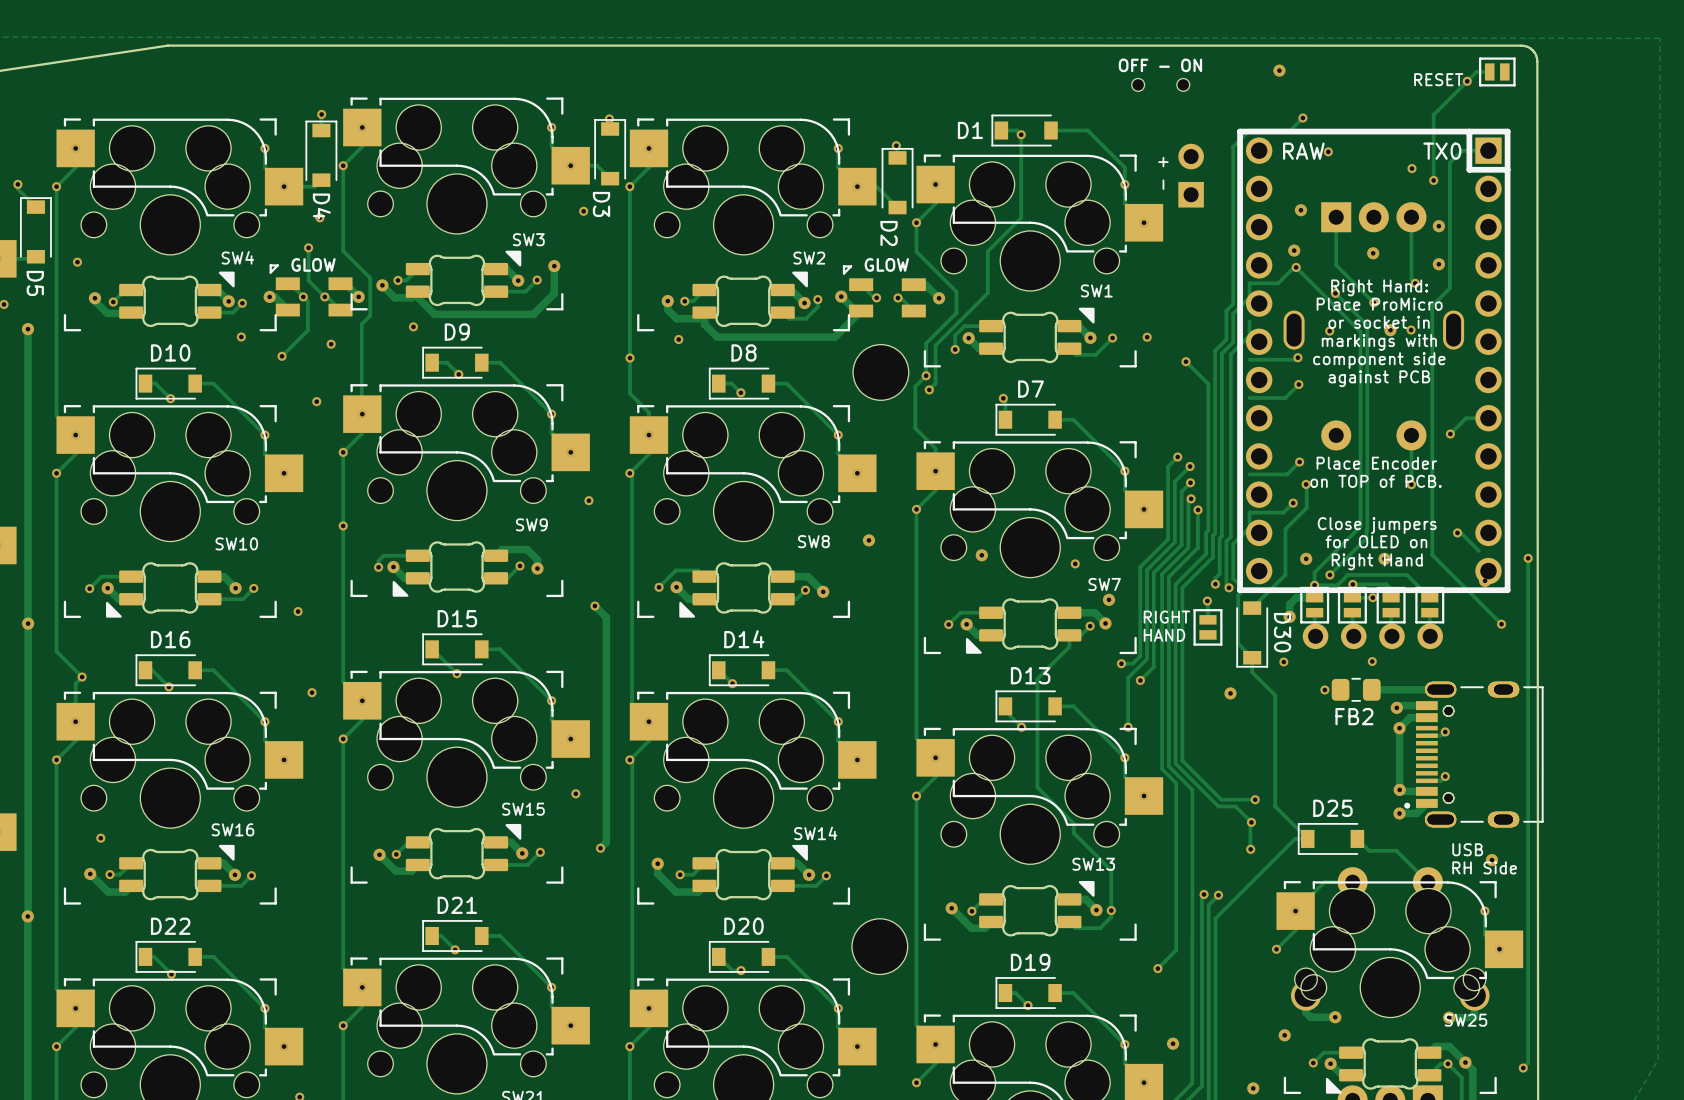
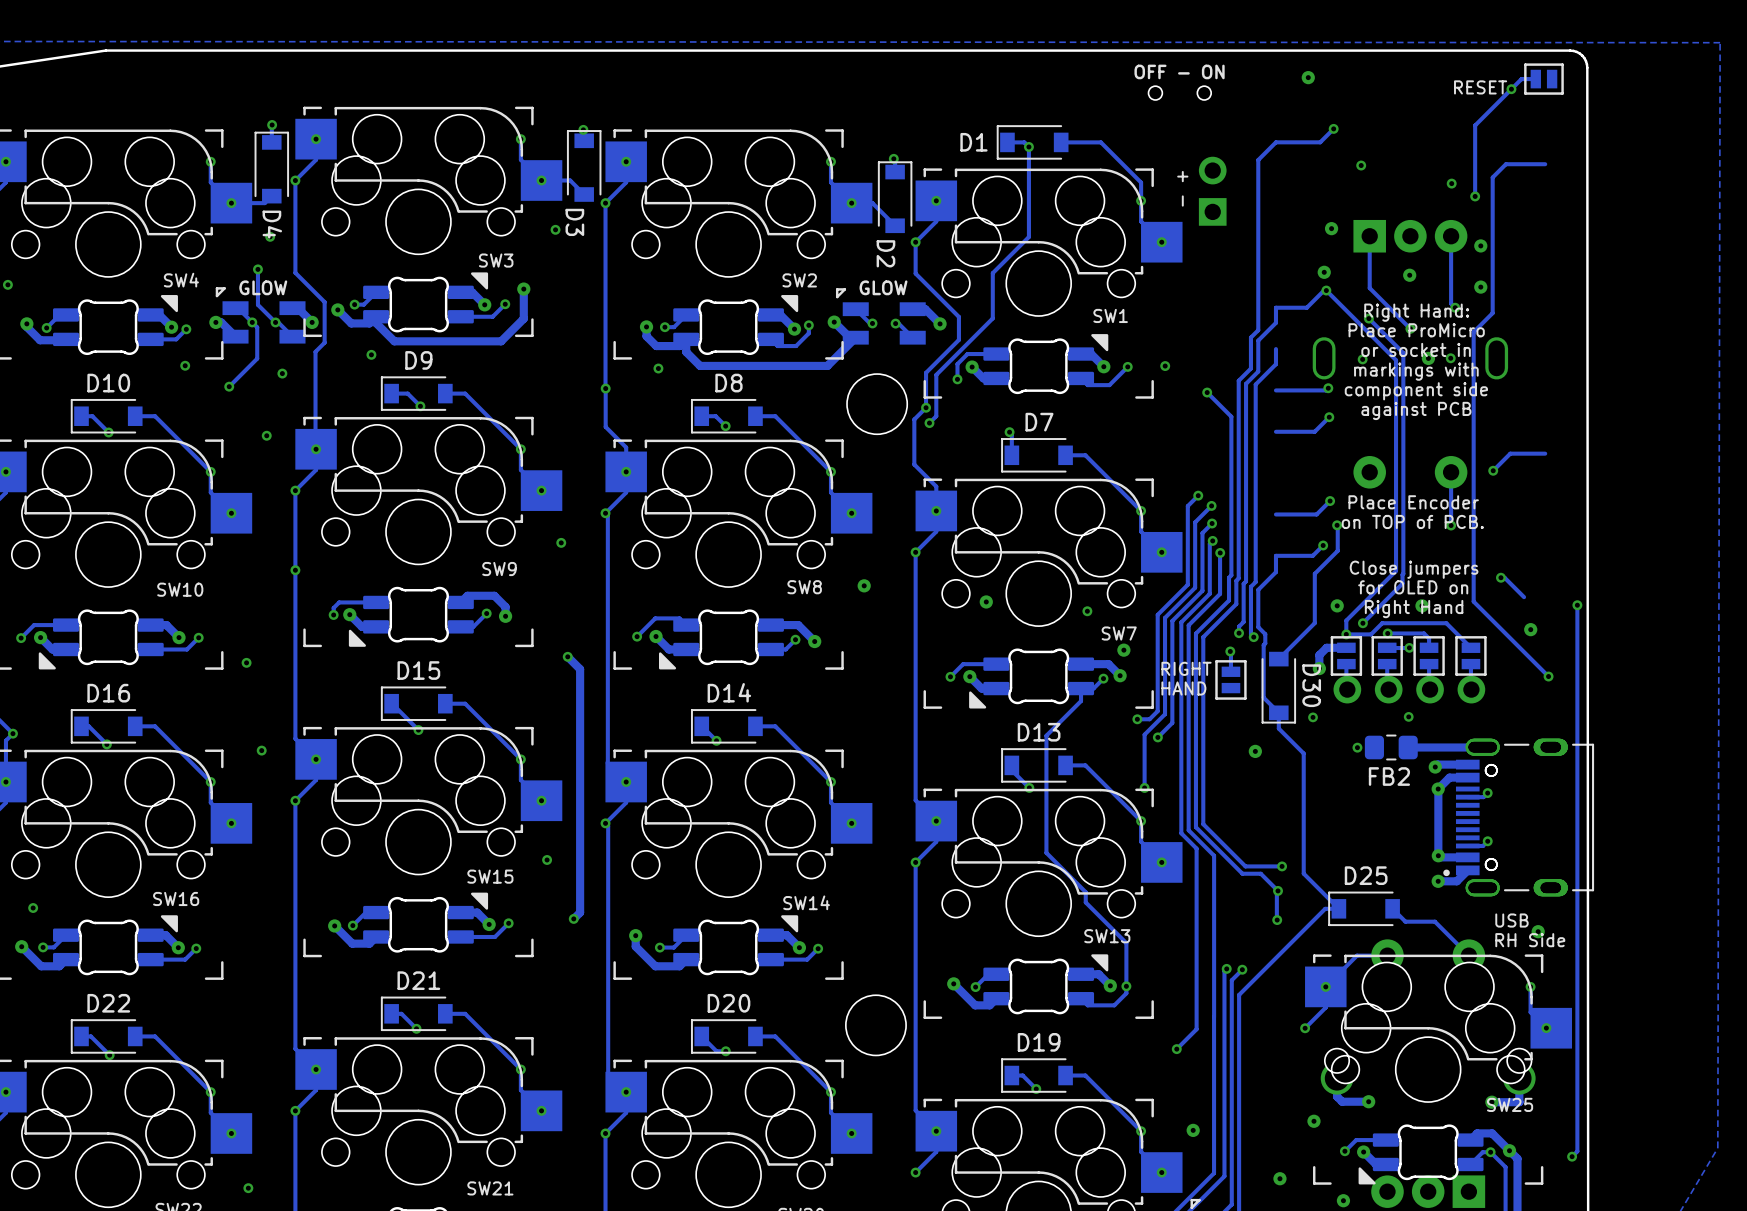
part: (1373, 360) -> none

